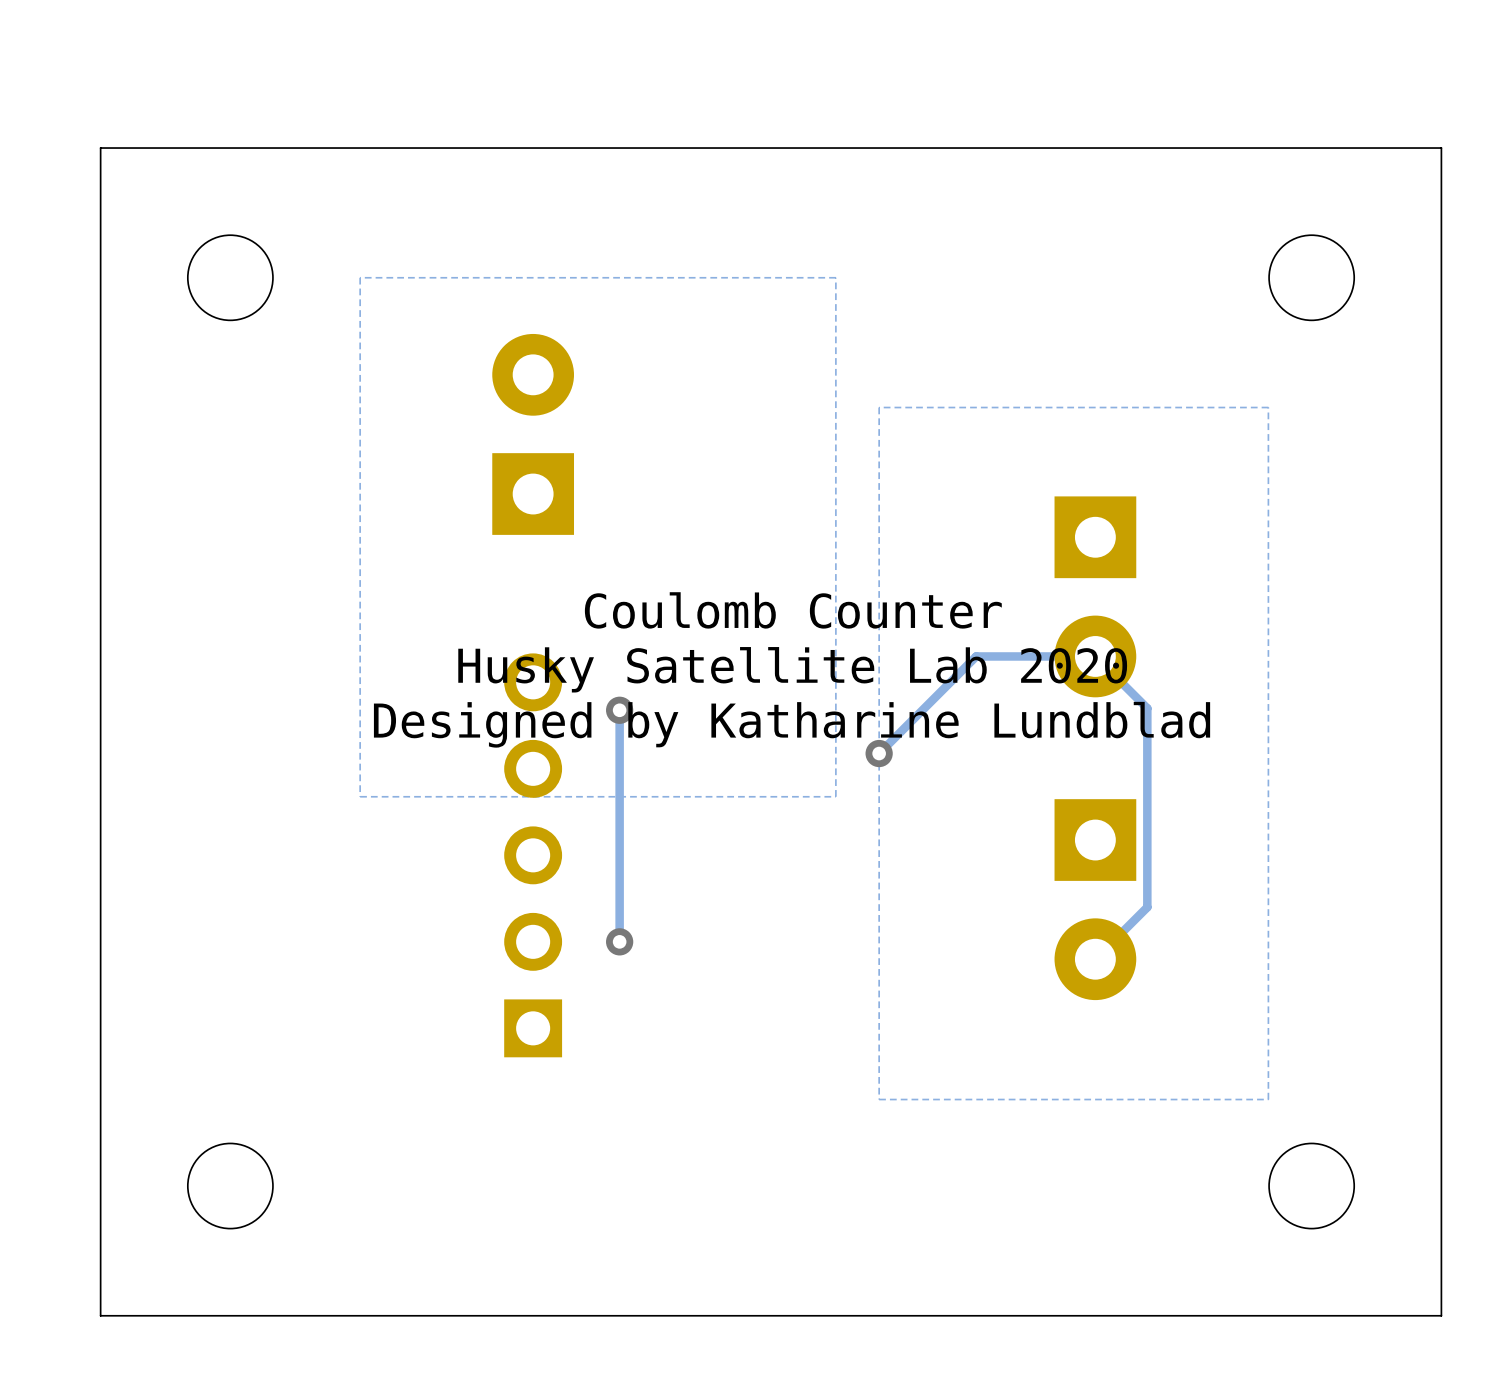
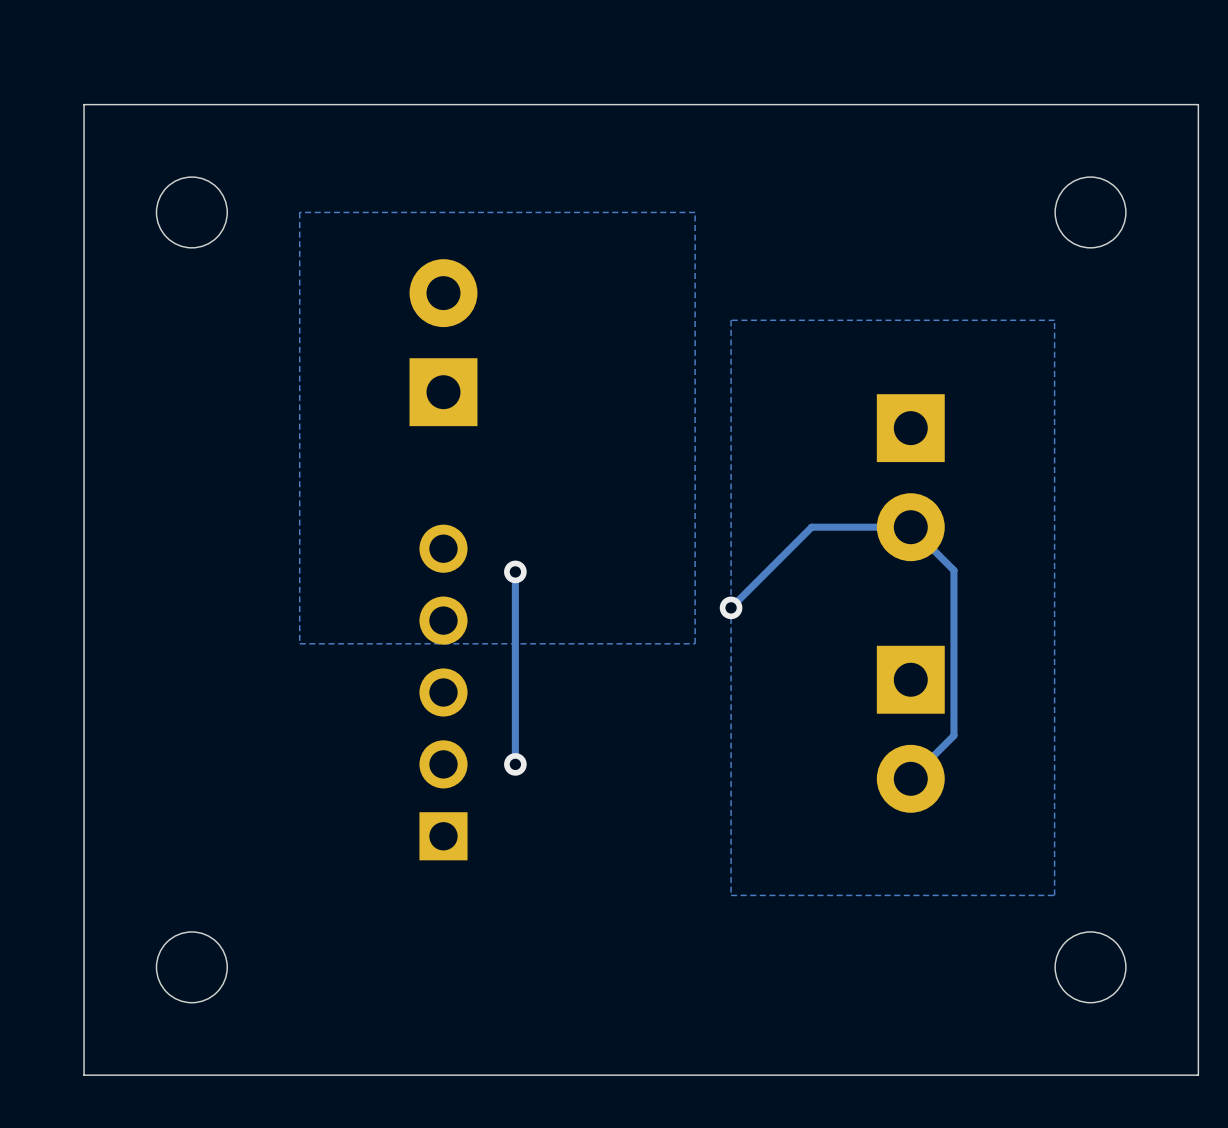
text: Coulomb Counter (793, 610) -> none
text: Husky Satellite Lab 2020 (792, 669) -> none
text: Designed by Katharine Lundblad (792, 724) -> none

